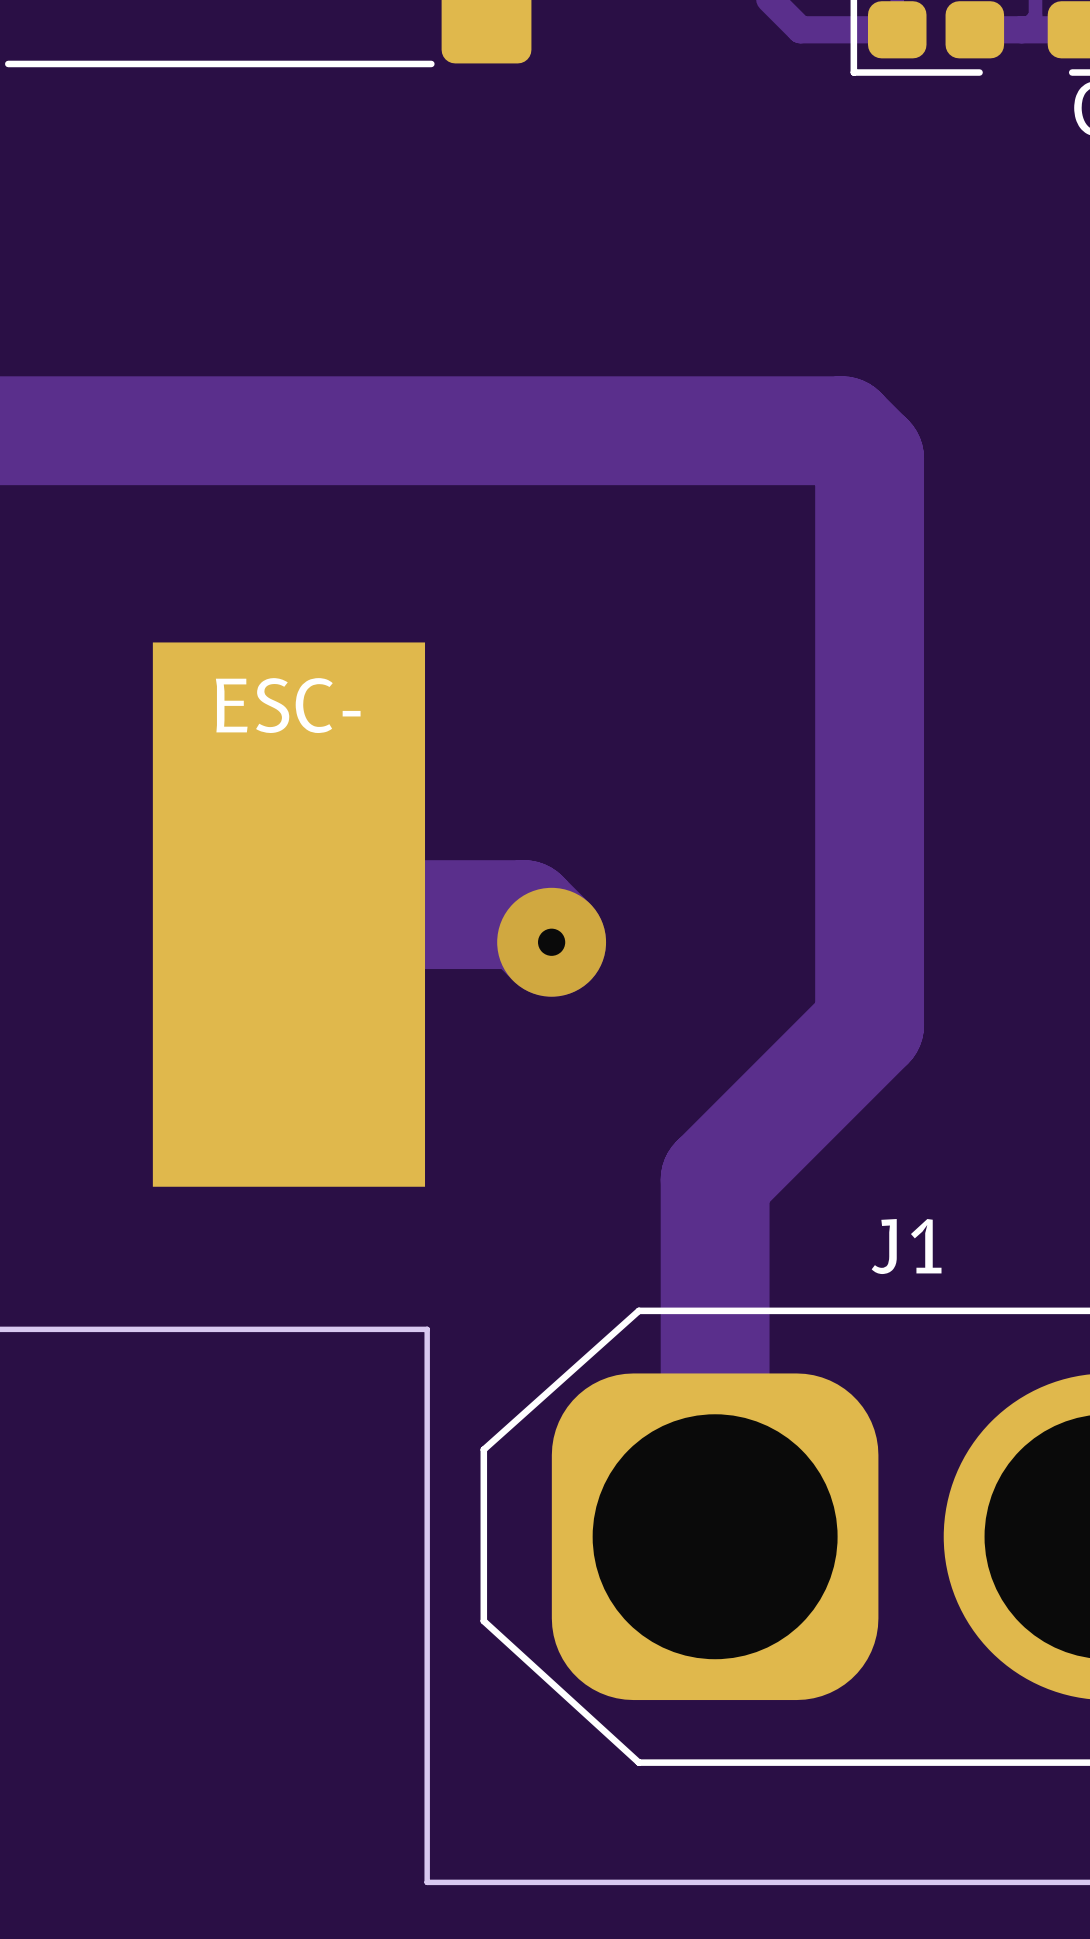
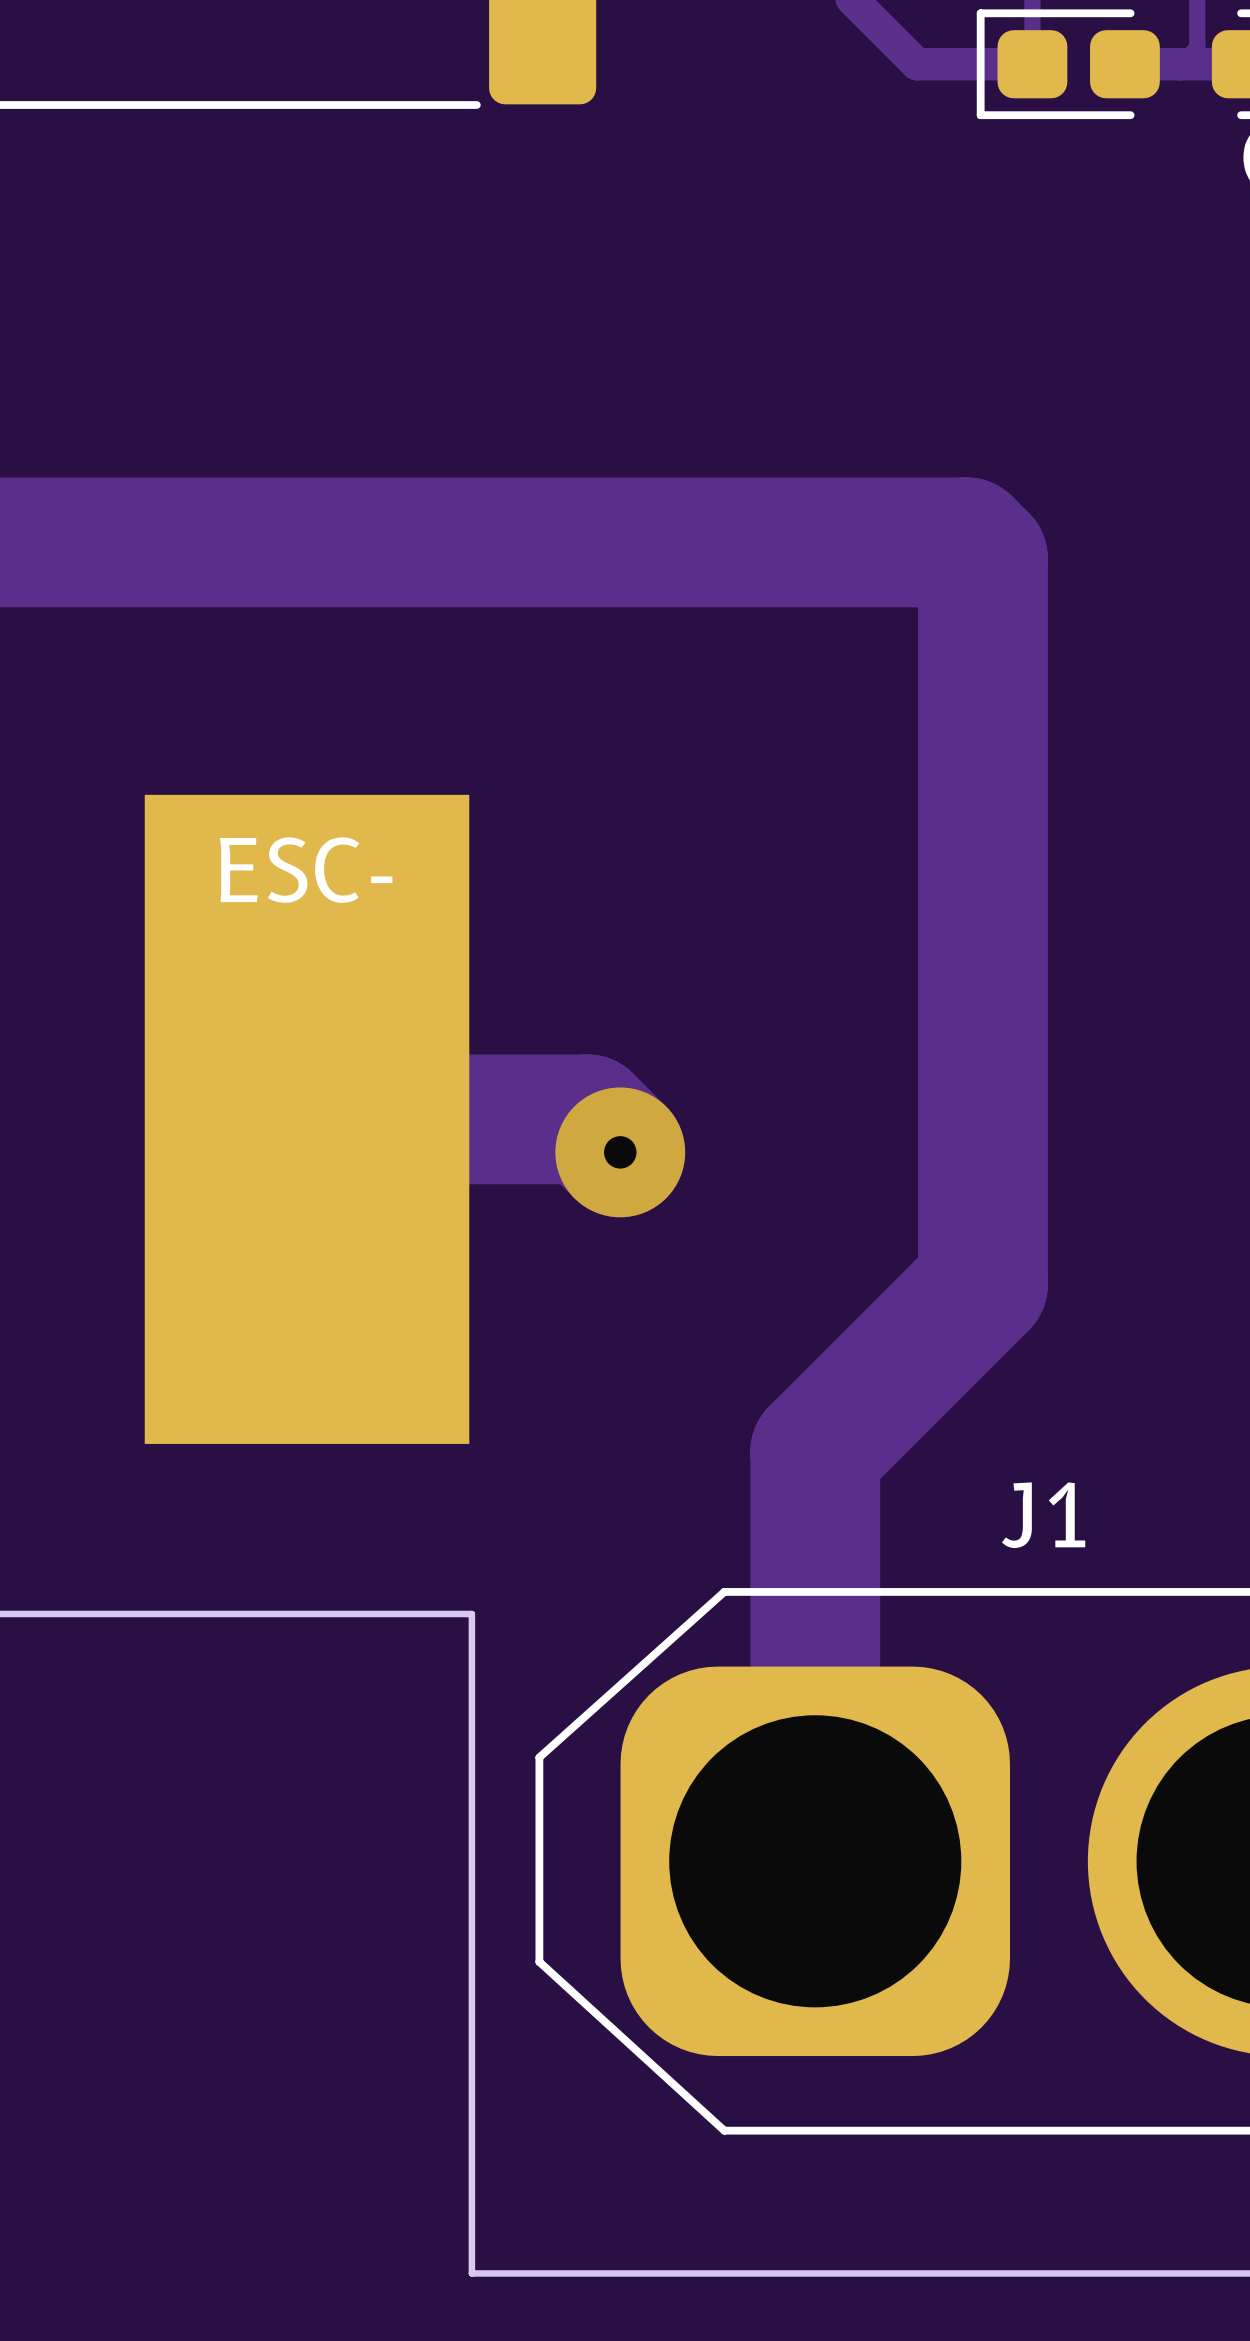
track: (855, 444) (869, 458) (869, 1025) (715, 1179) (715, 1193) -> (982, 558) (982, 1284) (815, 1451)

